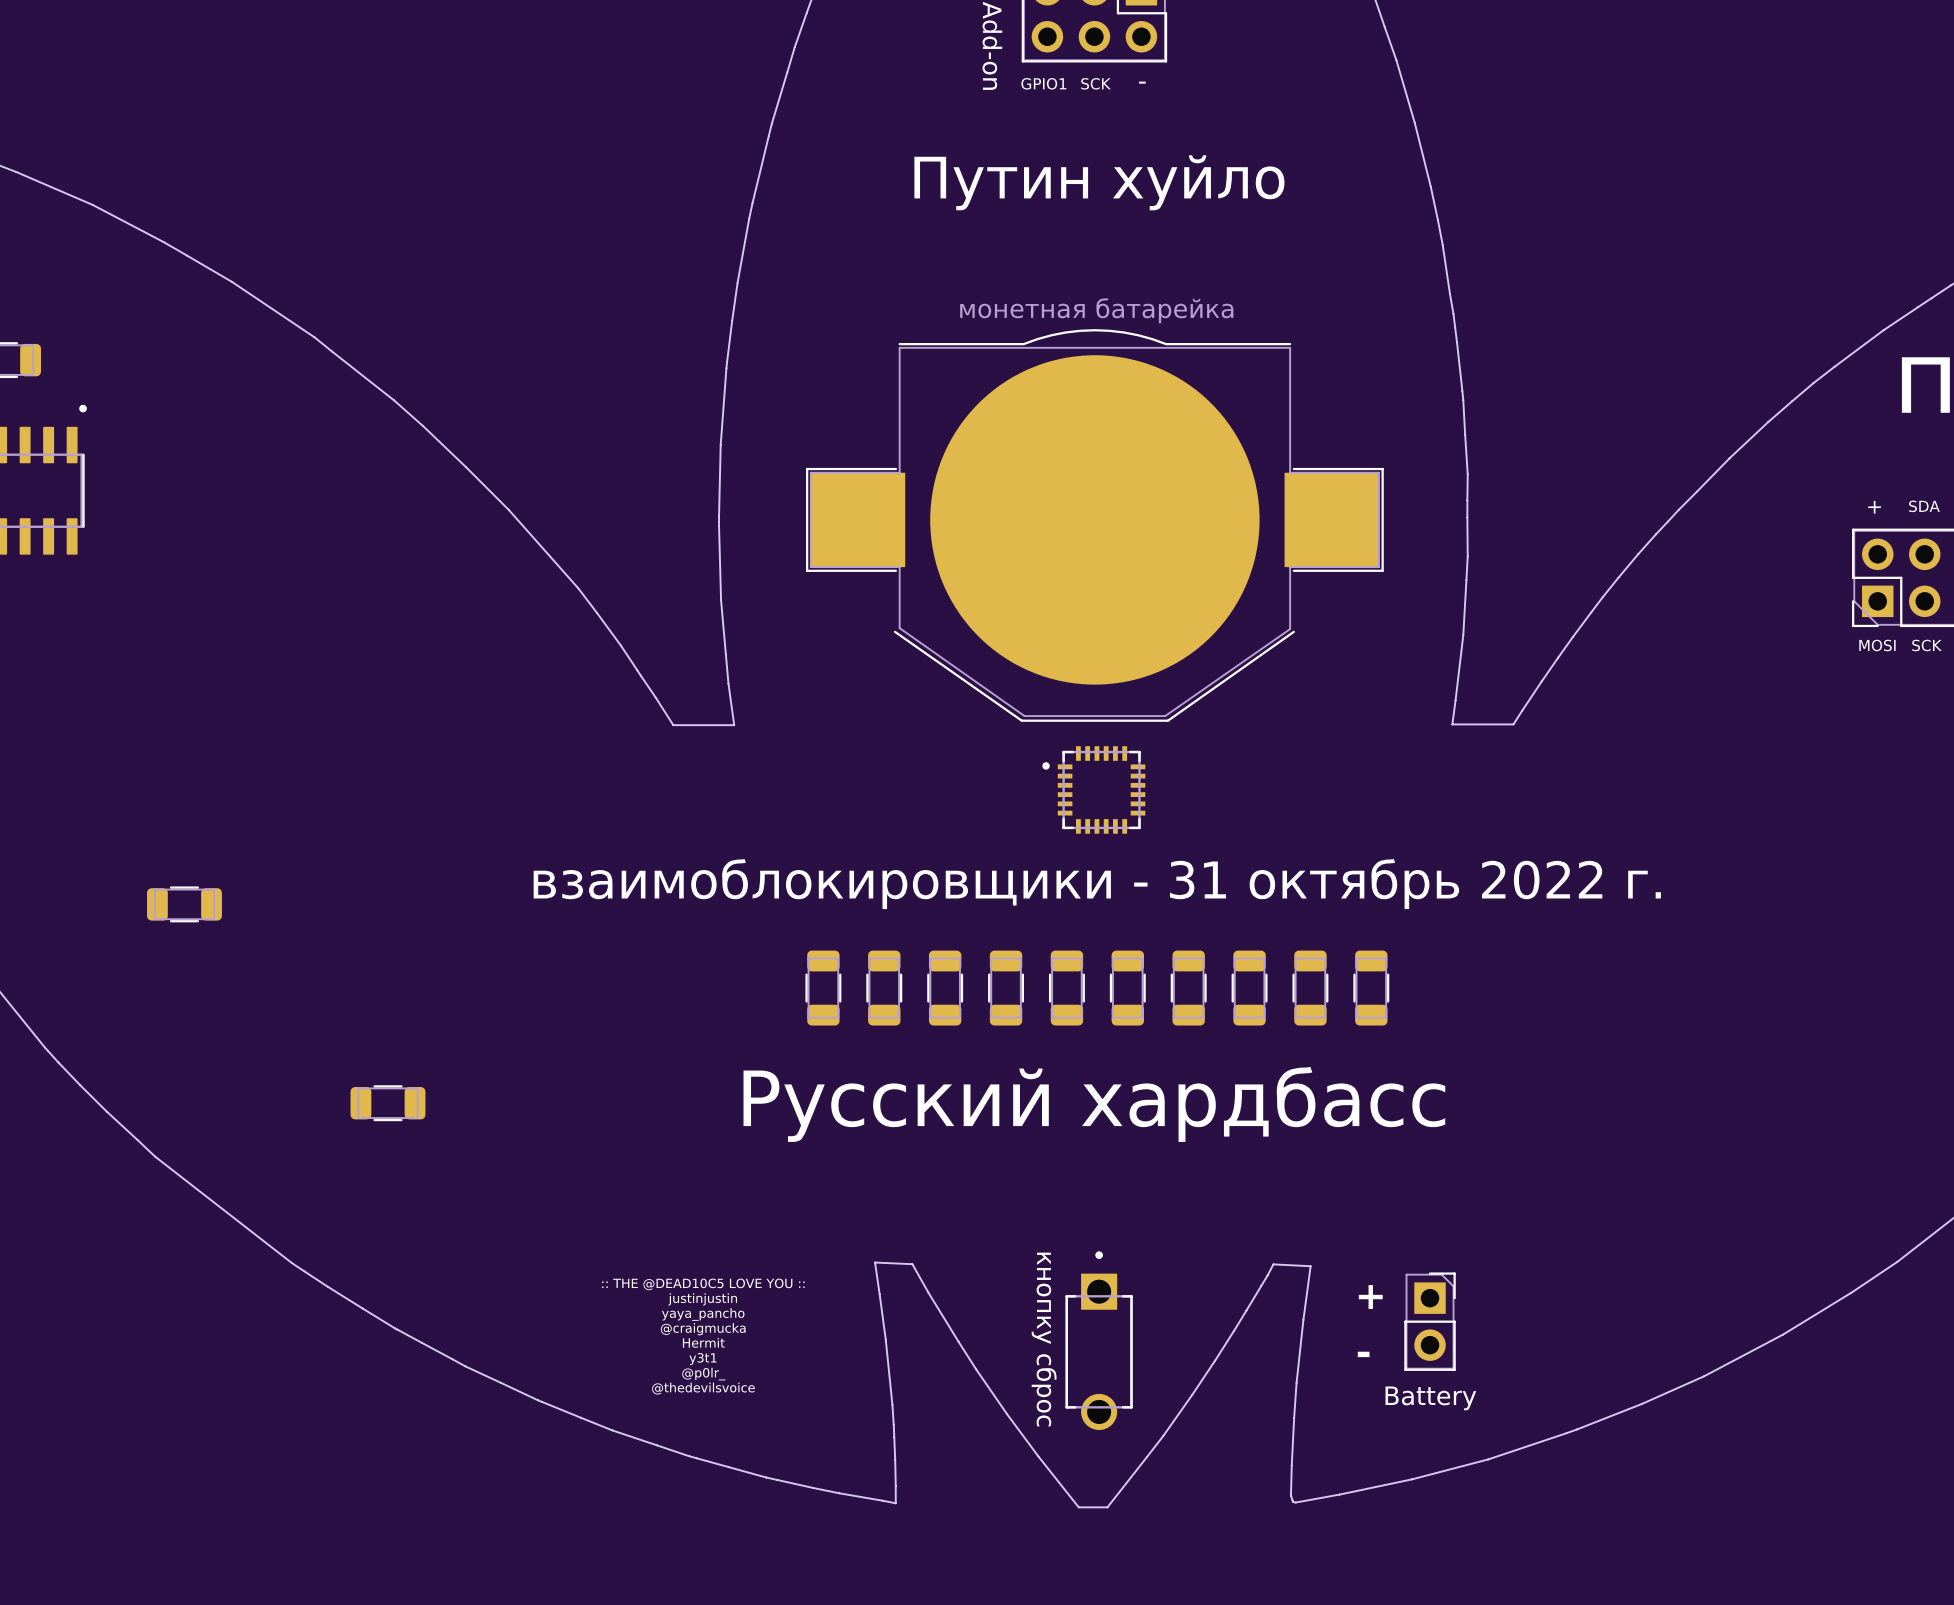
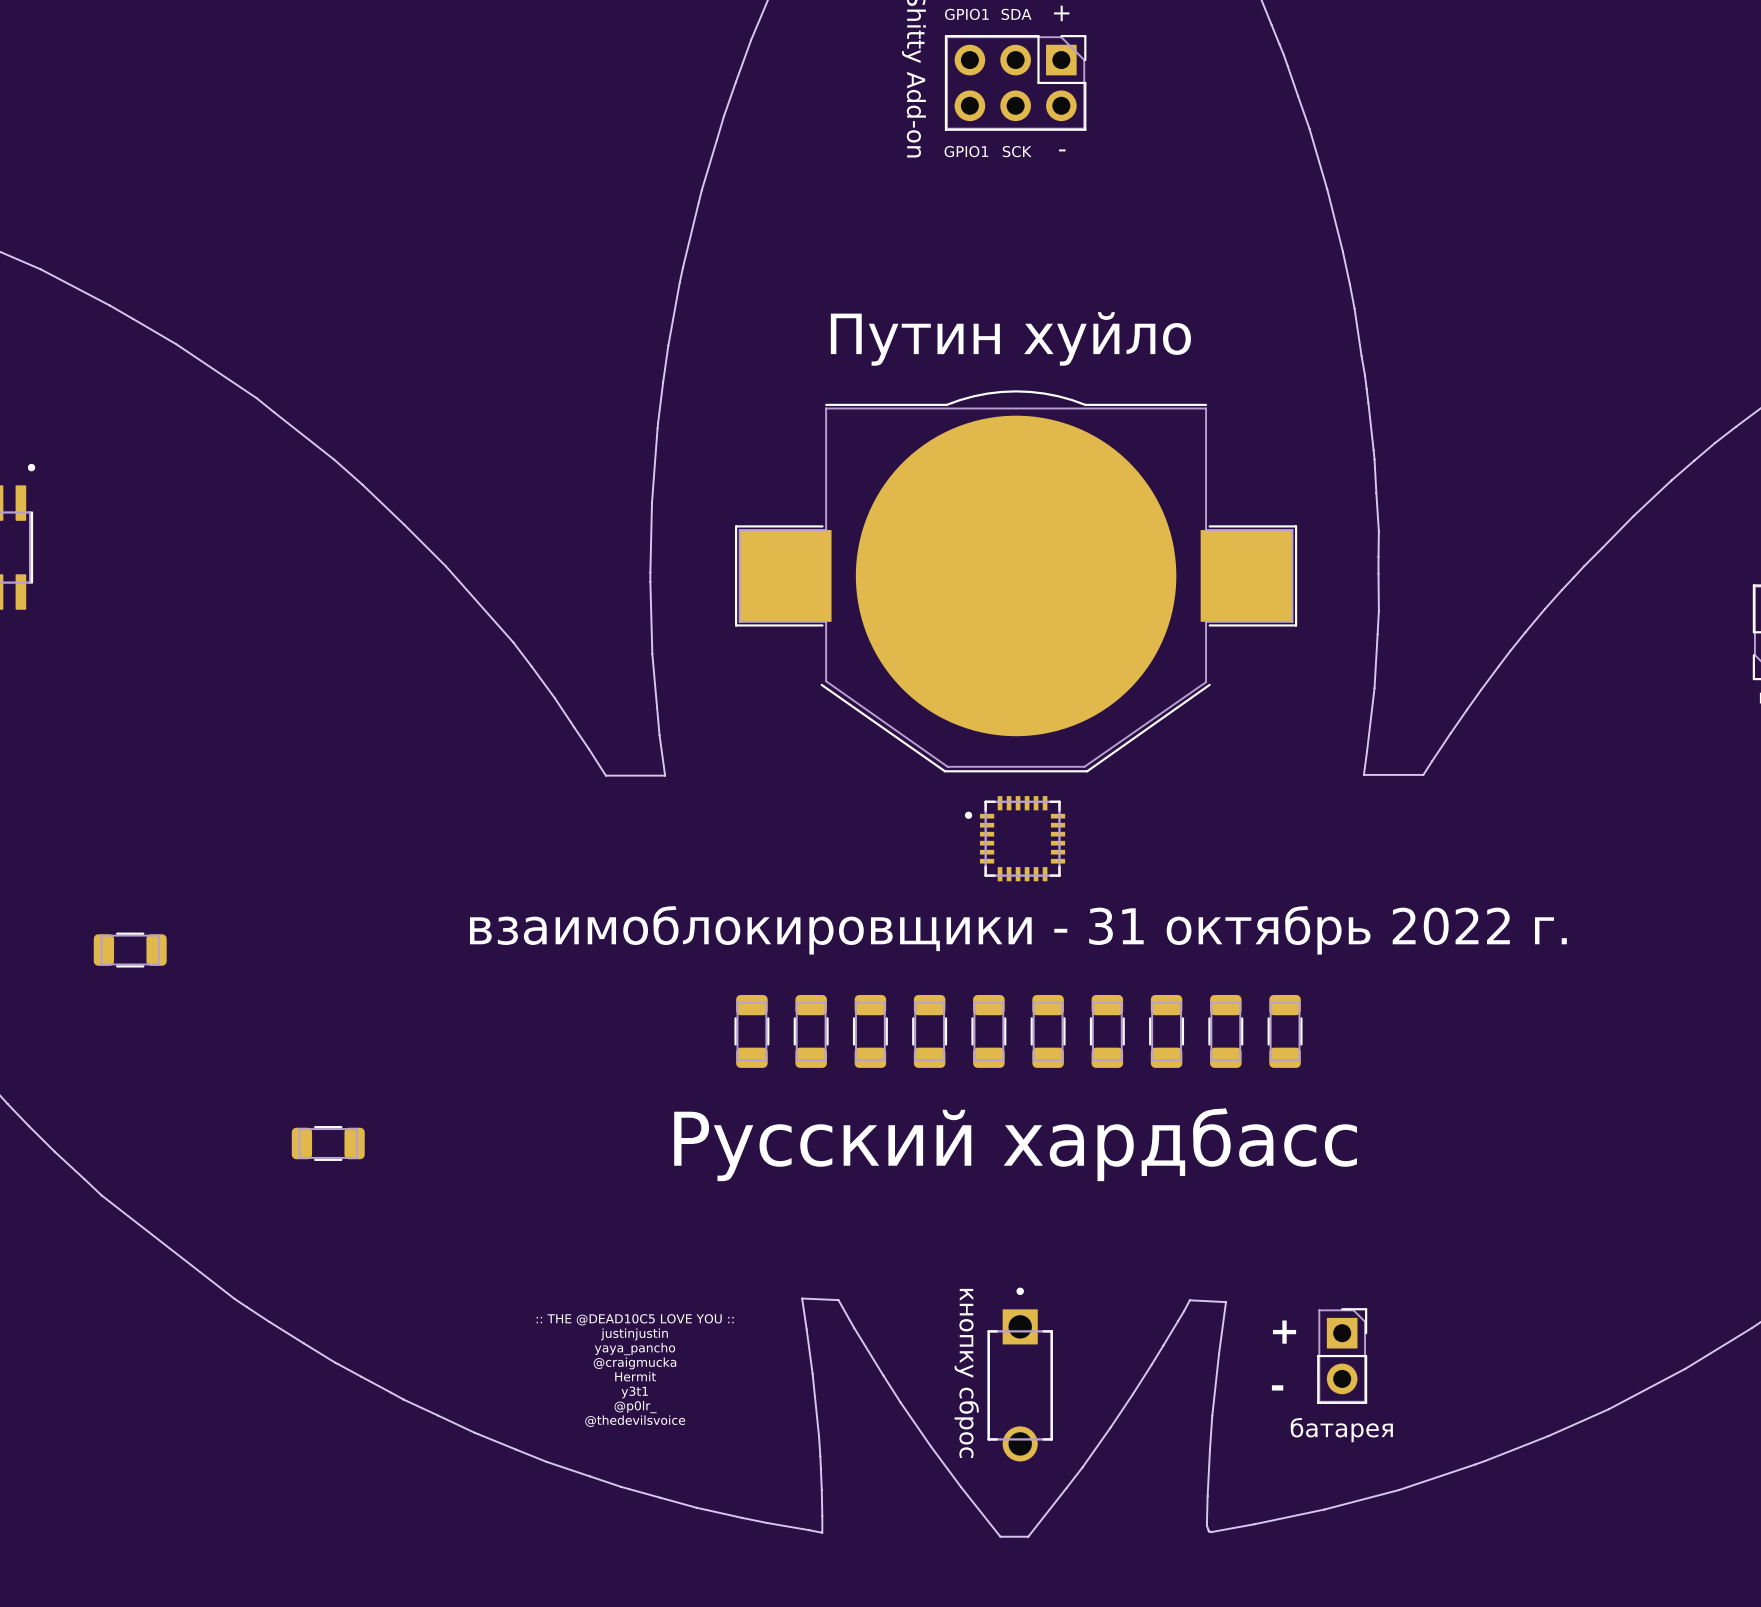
text position: Путин хуйло (1099, 182) -> Путин хуйло (1010, 338)
part value: монетная батарейка (1096, 310) -> none
part value: Battery (1430, 1398) -> батарея (1341, 1430)

